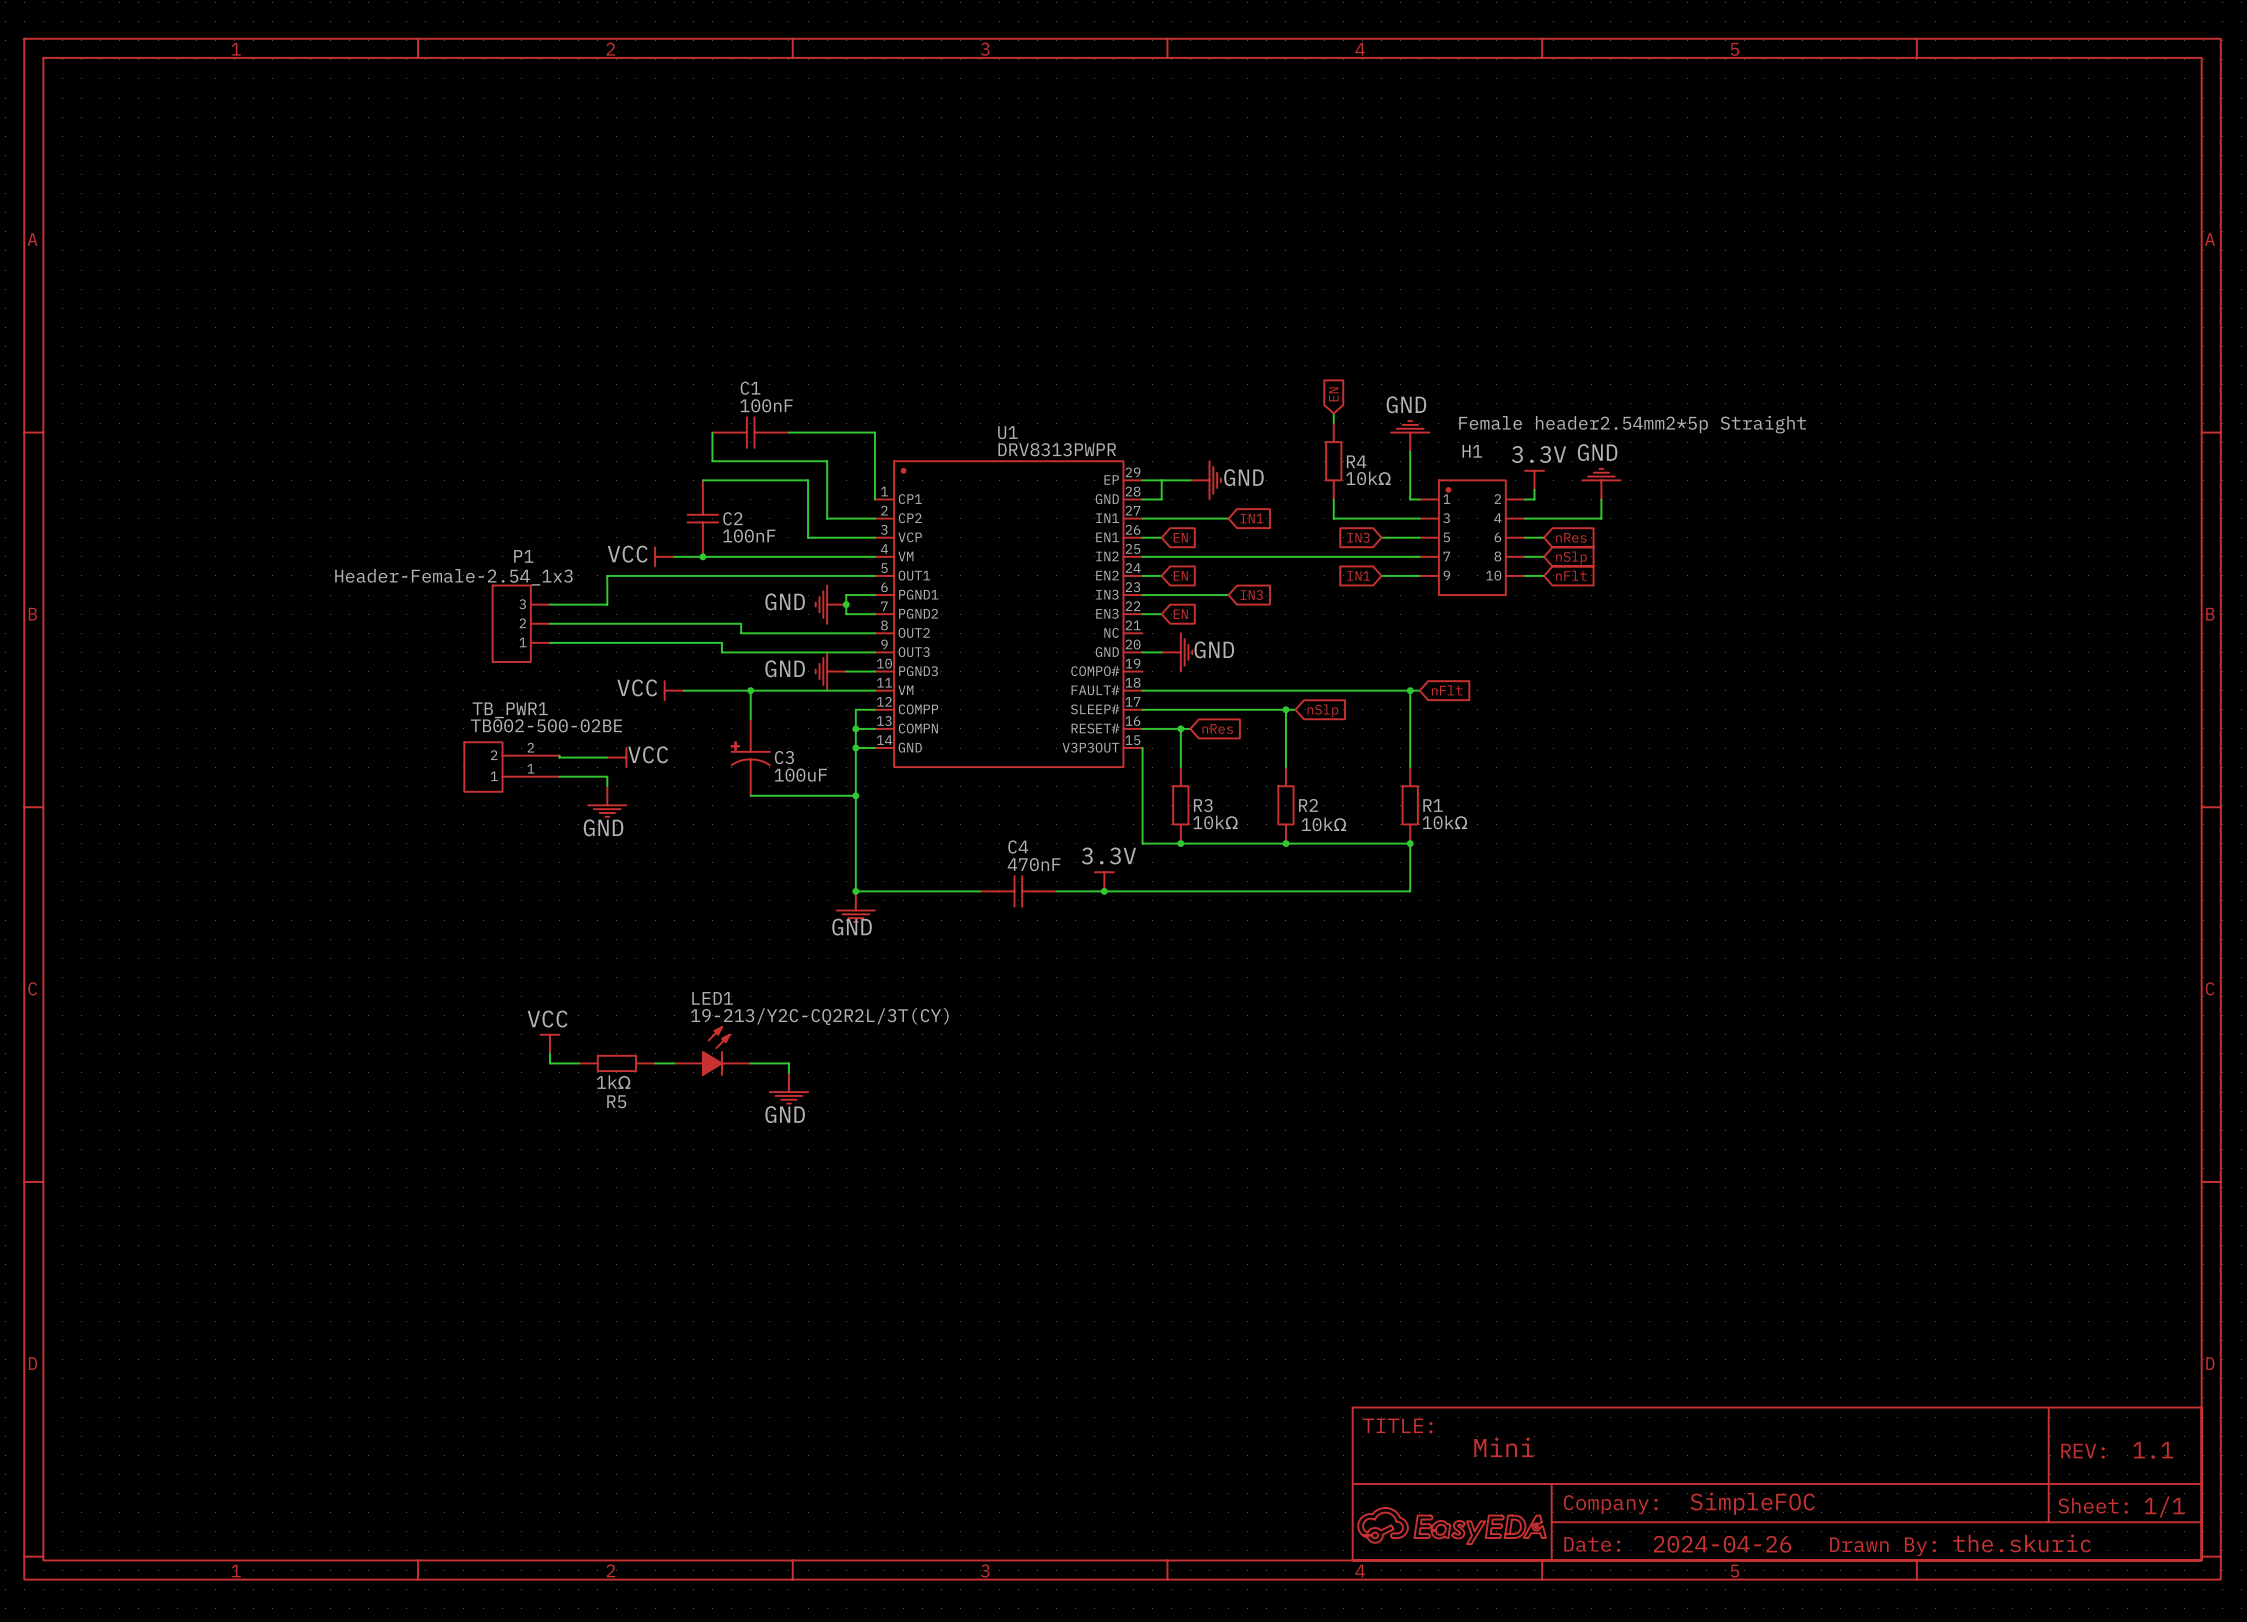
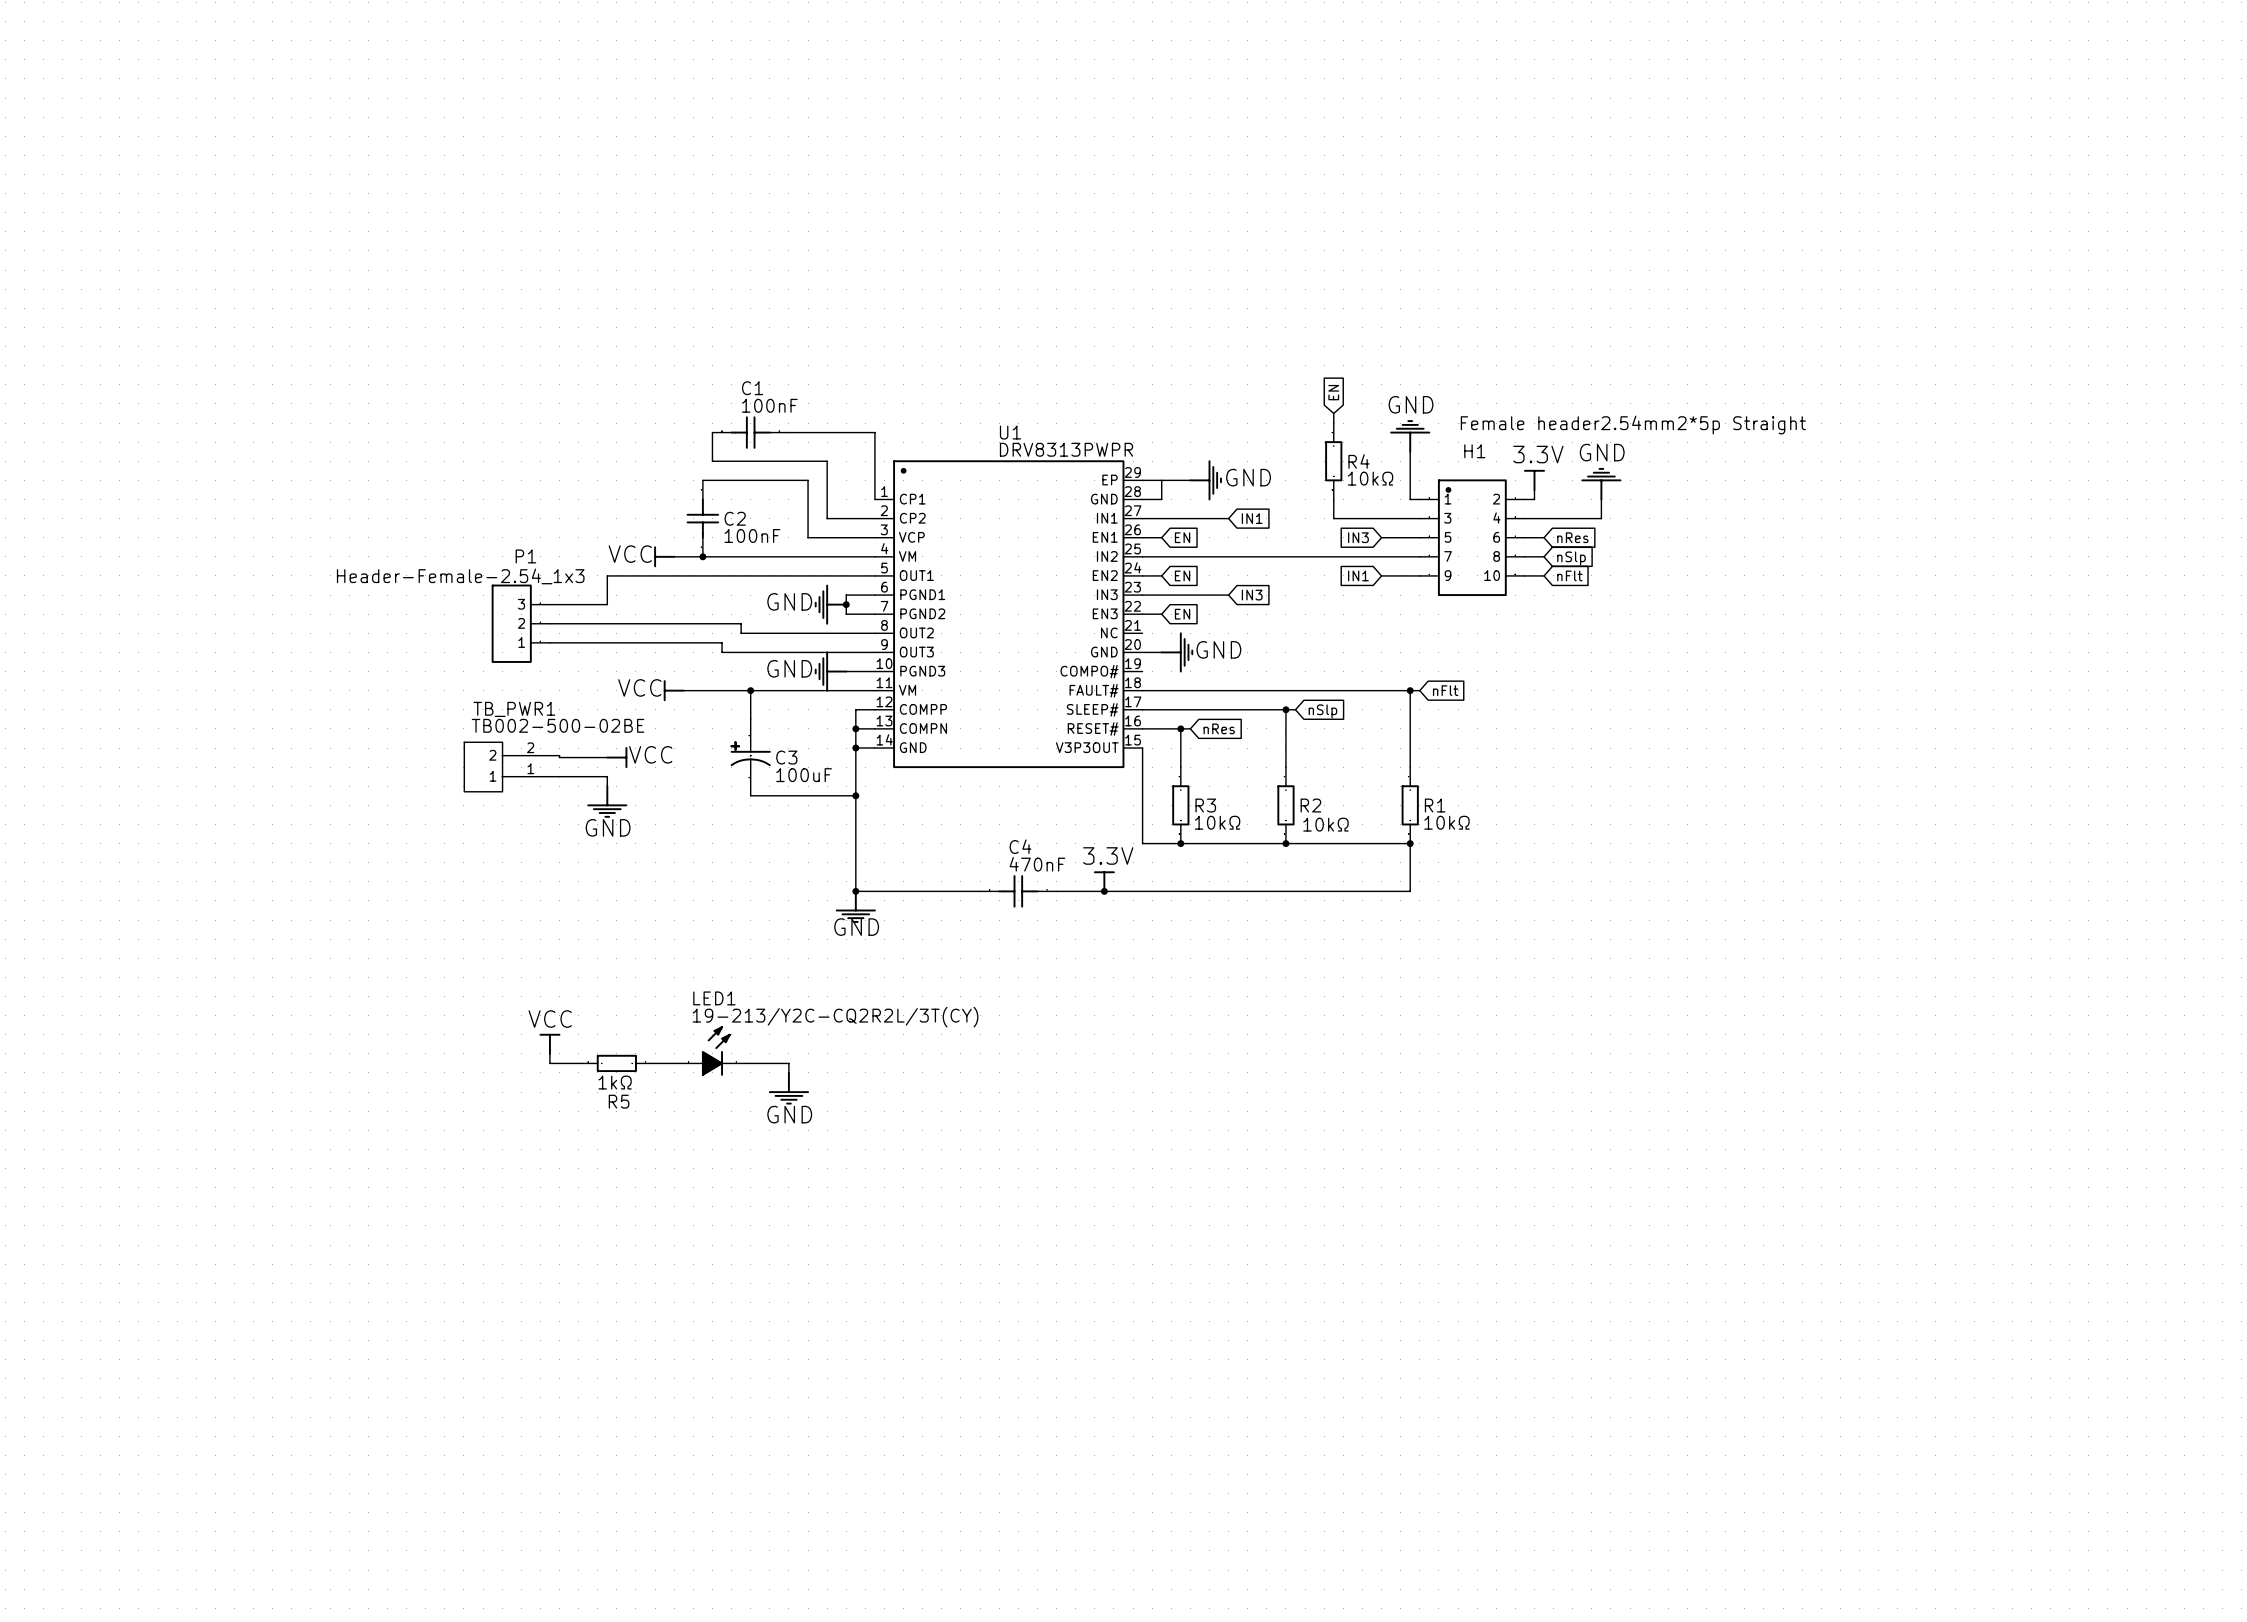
part: (1122, 809) -> none

